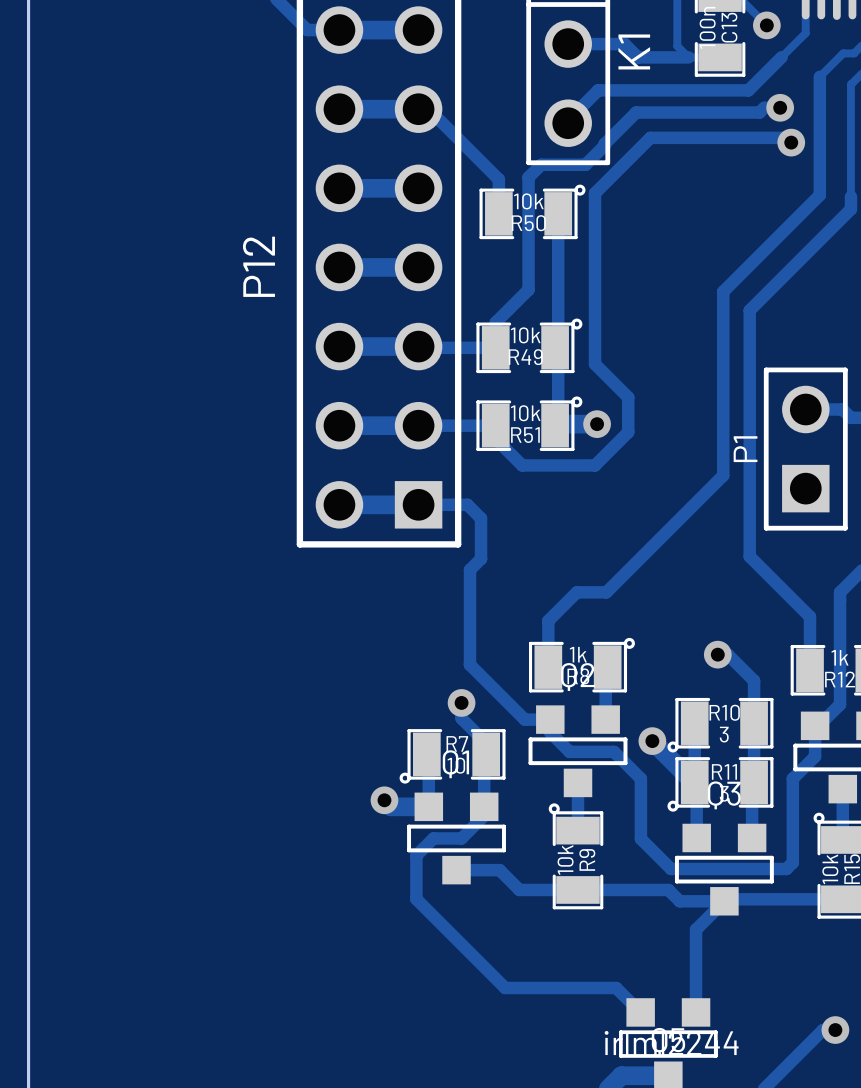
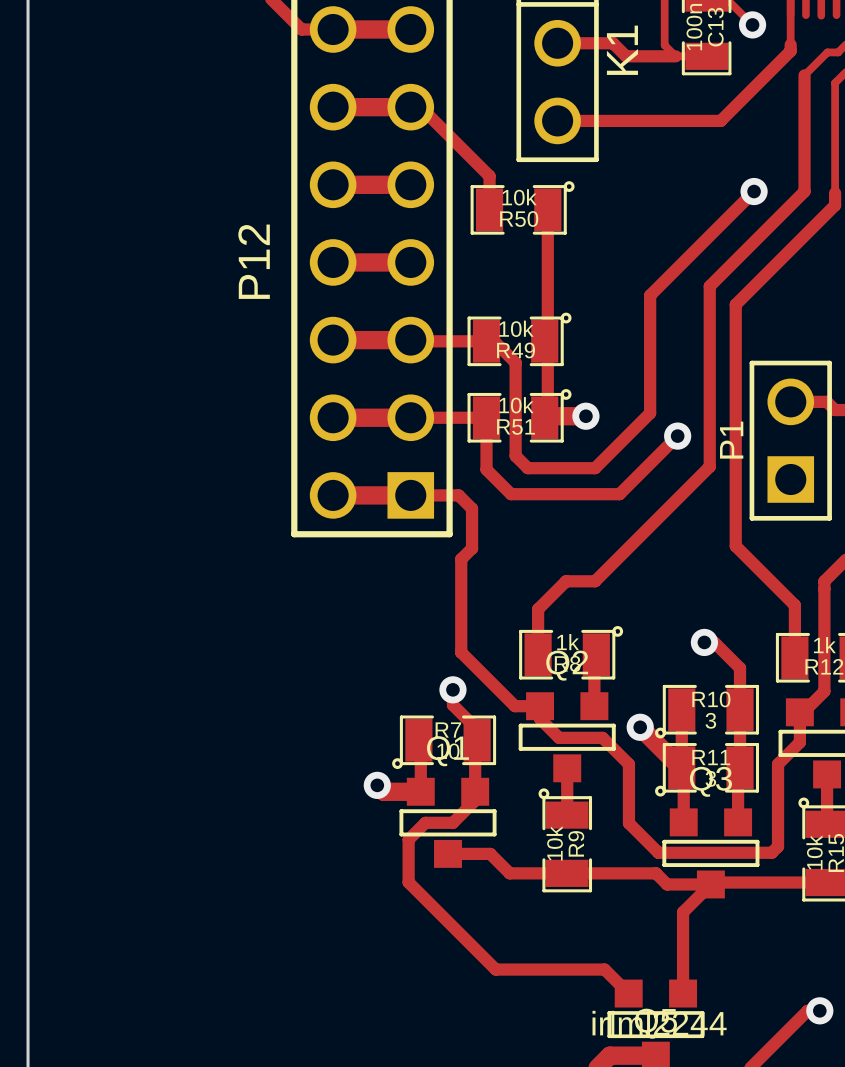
track: (805, 33) (748, 90) (598, 90) (568, 120) (568, 123) -> (790, 32) (790, 51) (720, 120) (557, 120)
track: (780, 107) (764, 107) (759, 112) (636, 112) (585, 164) (541, 164) (528, 177) (528, 289) (495, 322) (495, 347) -> (754, 191) (650, 295) (650, 413) (595, 468) (527, 468) (515, 455) (515, 362) (494, 341) (486, 341)
via: (780, 107) -> none
track: (791, 142) (786, 137) (650, 137) (595, 193) (595, 364) (628, 397) (628, 432) (595, 465) (522, 465) (495, 438) -> (677, 436) (619, 494) (511, 494) (486, 469) (486, 430)
via: (791, 142) -> none
via: none -> (754, 191)
via: none -> (677, 436)

